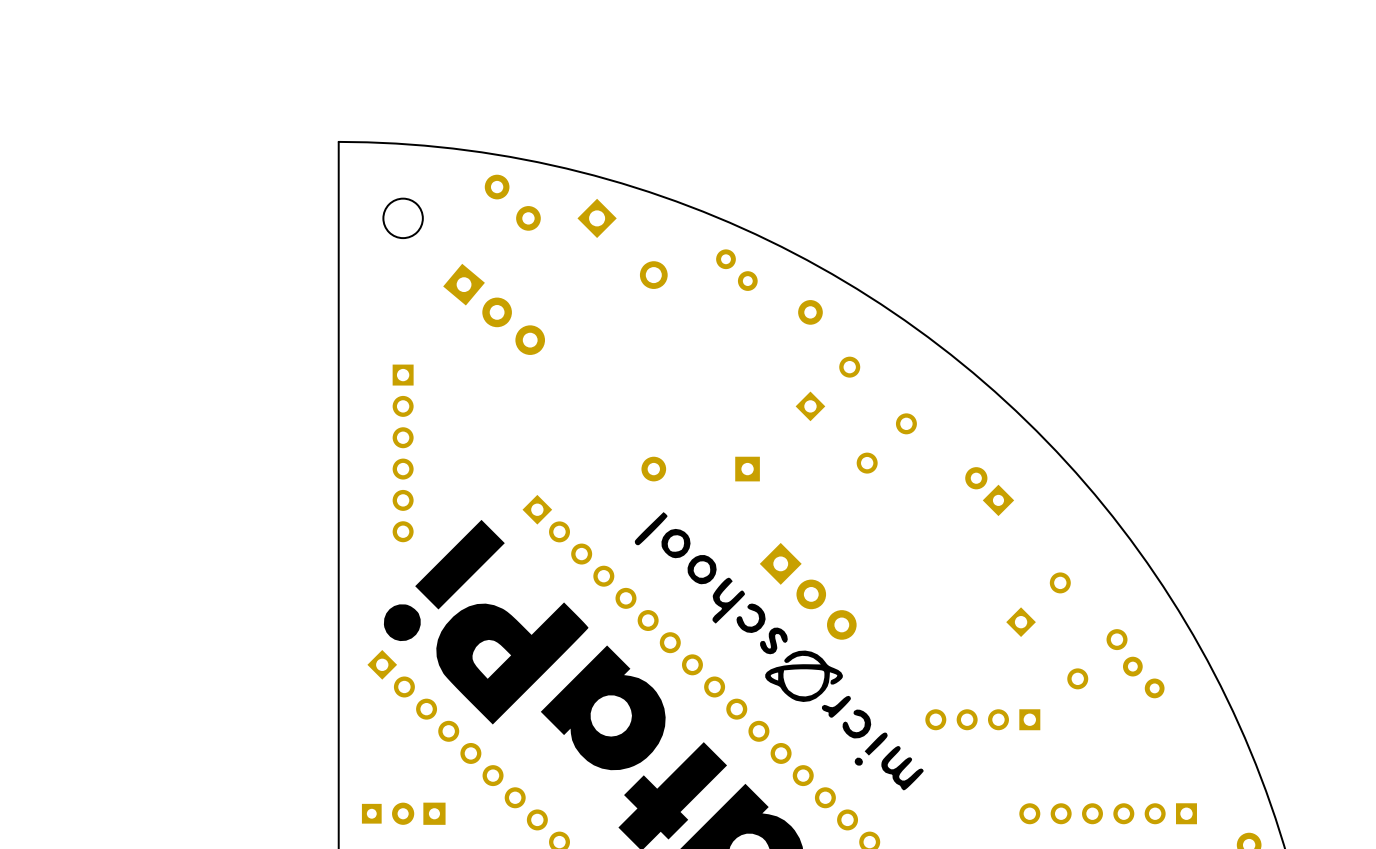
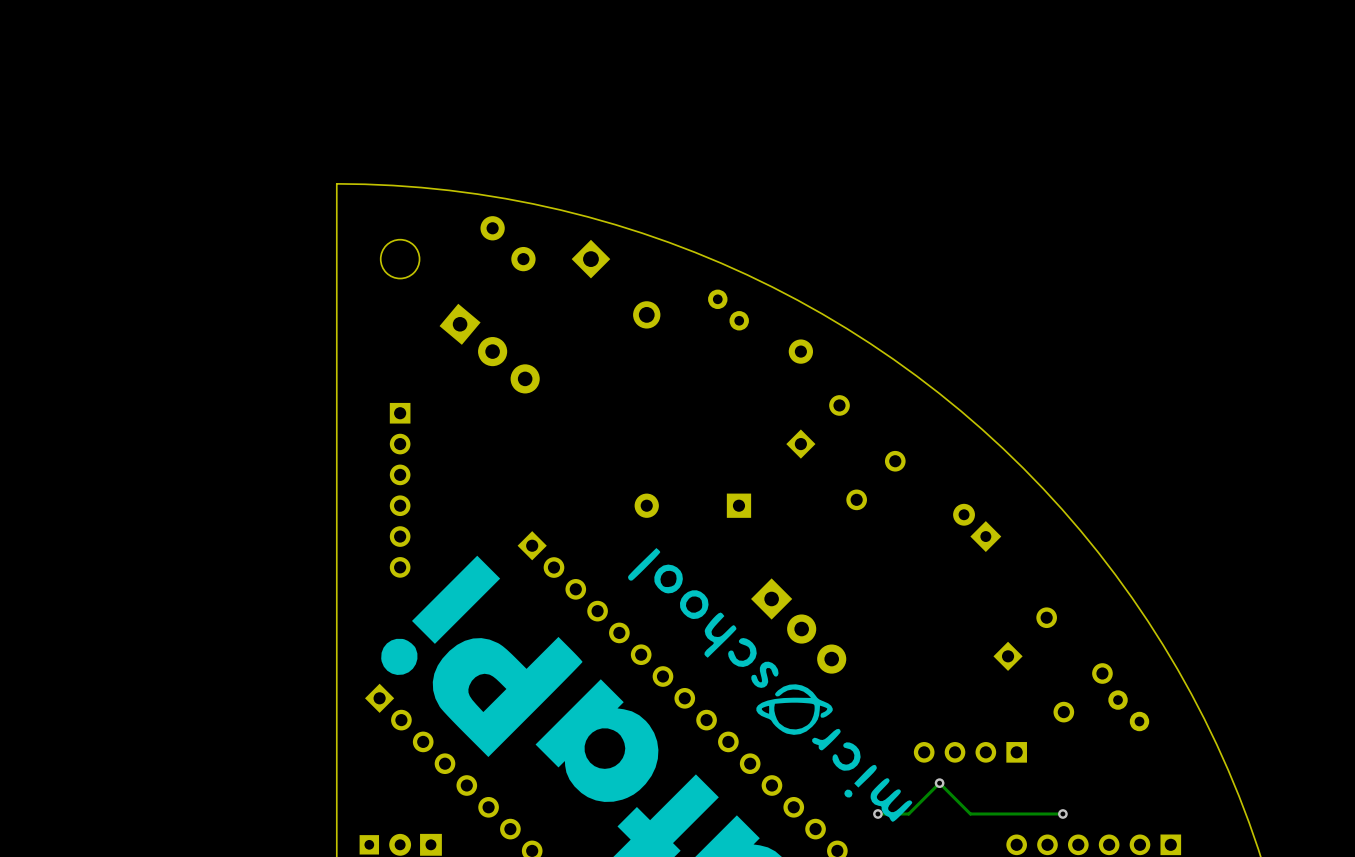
via: none -> (939, 783)
via: none -> (877, 813)
track: none -> (1062, 813) (970, 813) (939, 783) (908, 813) (877, 813)
via: none -> (1062, 813)

